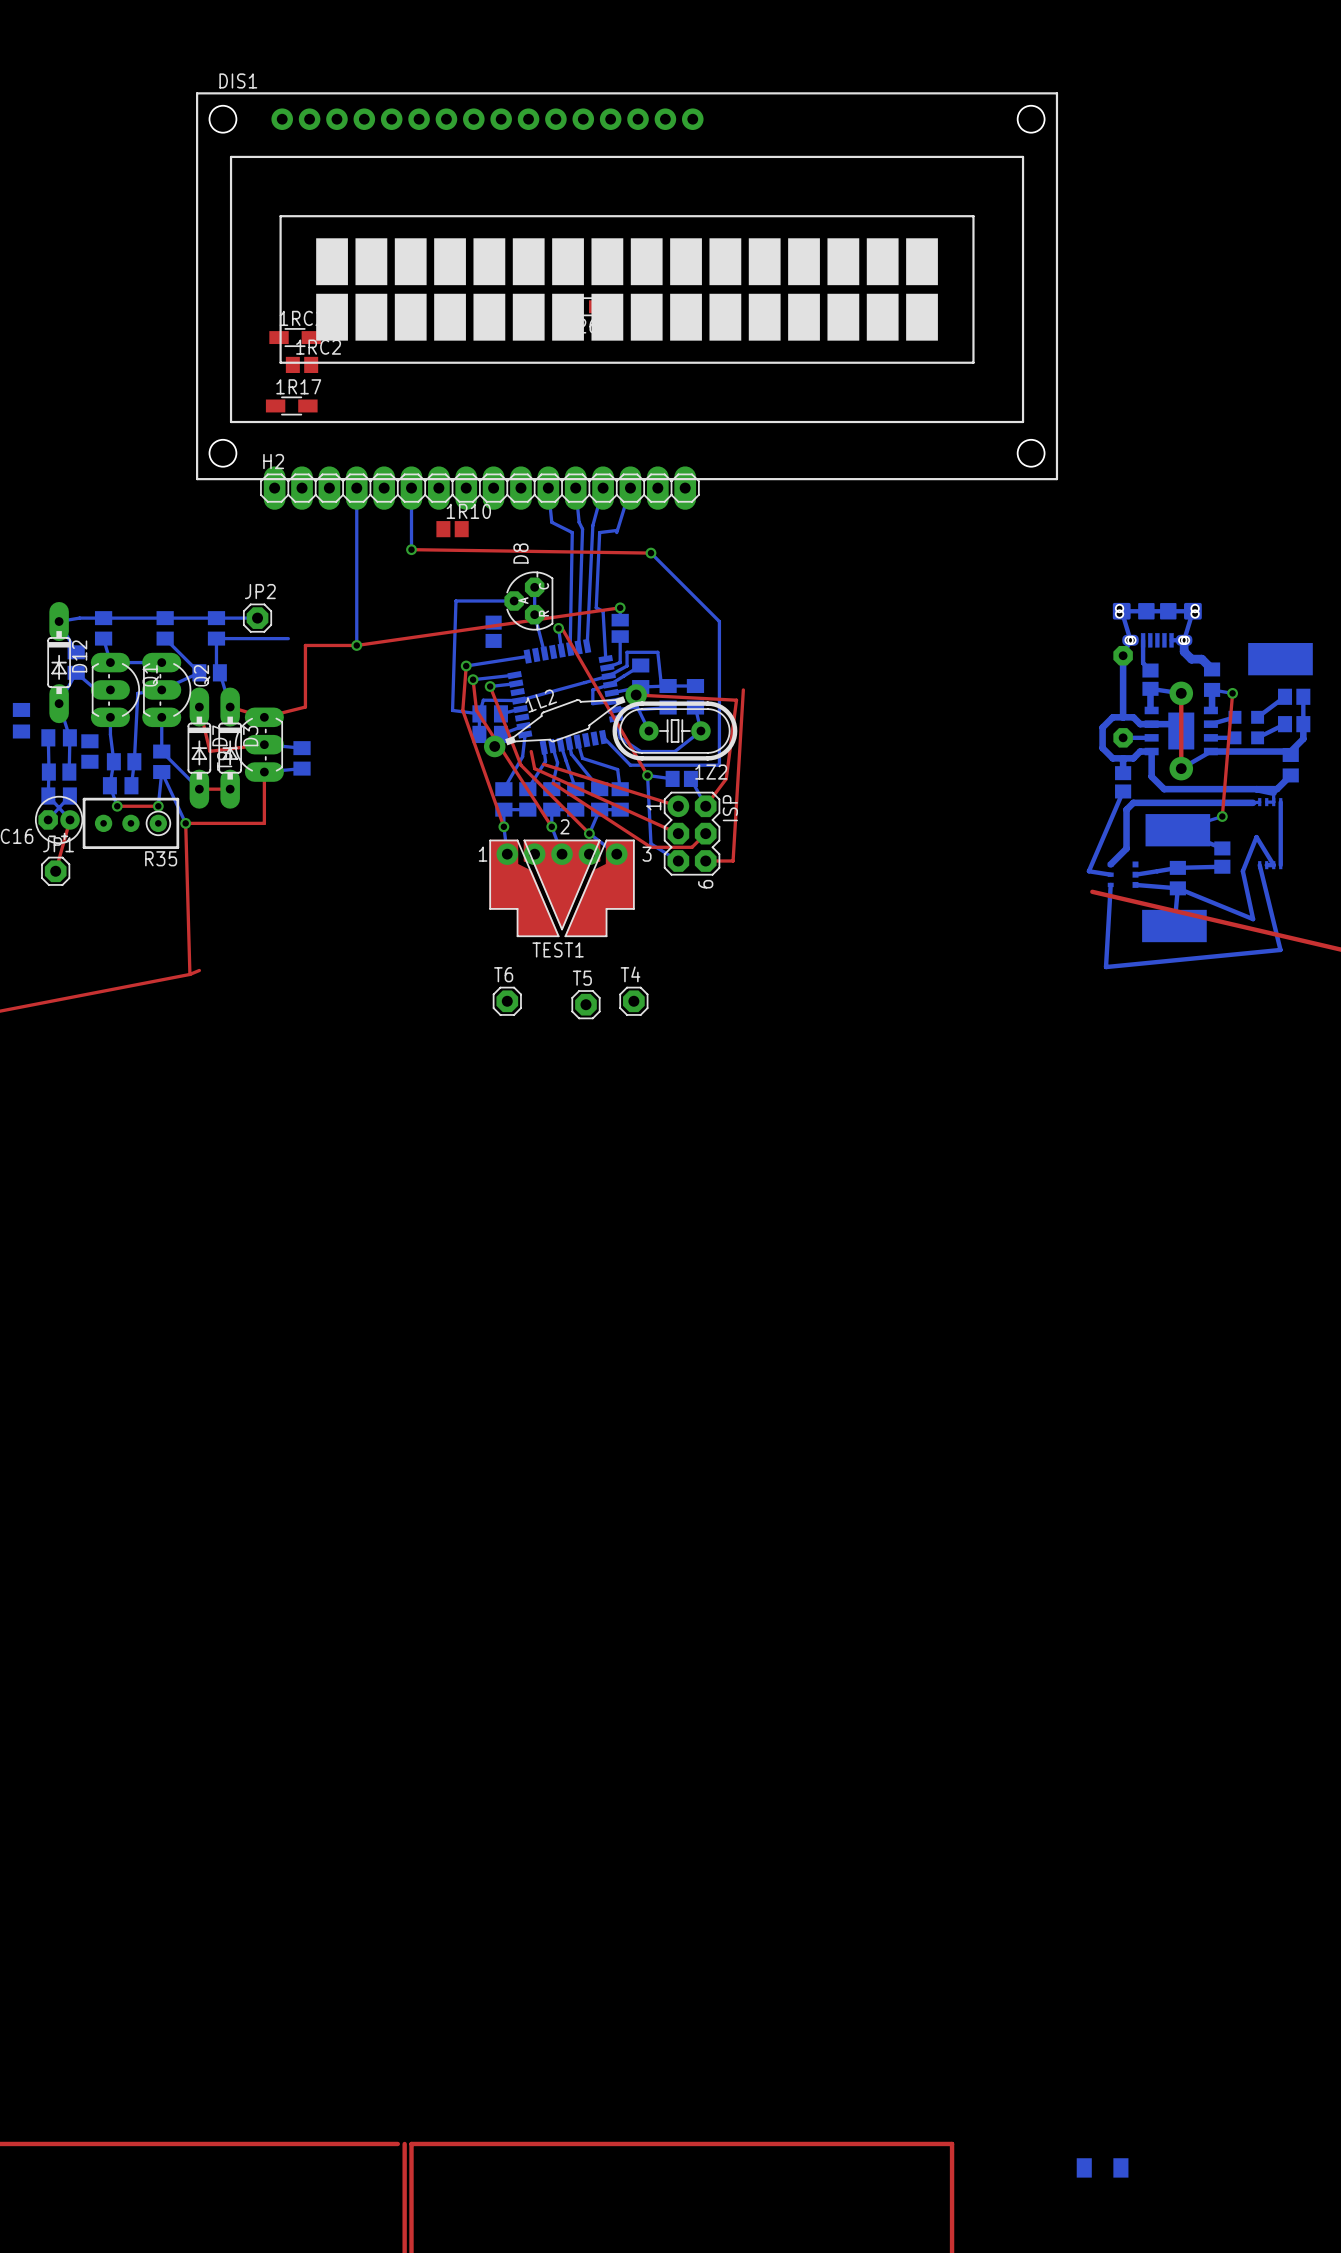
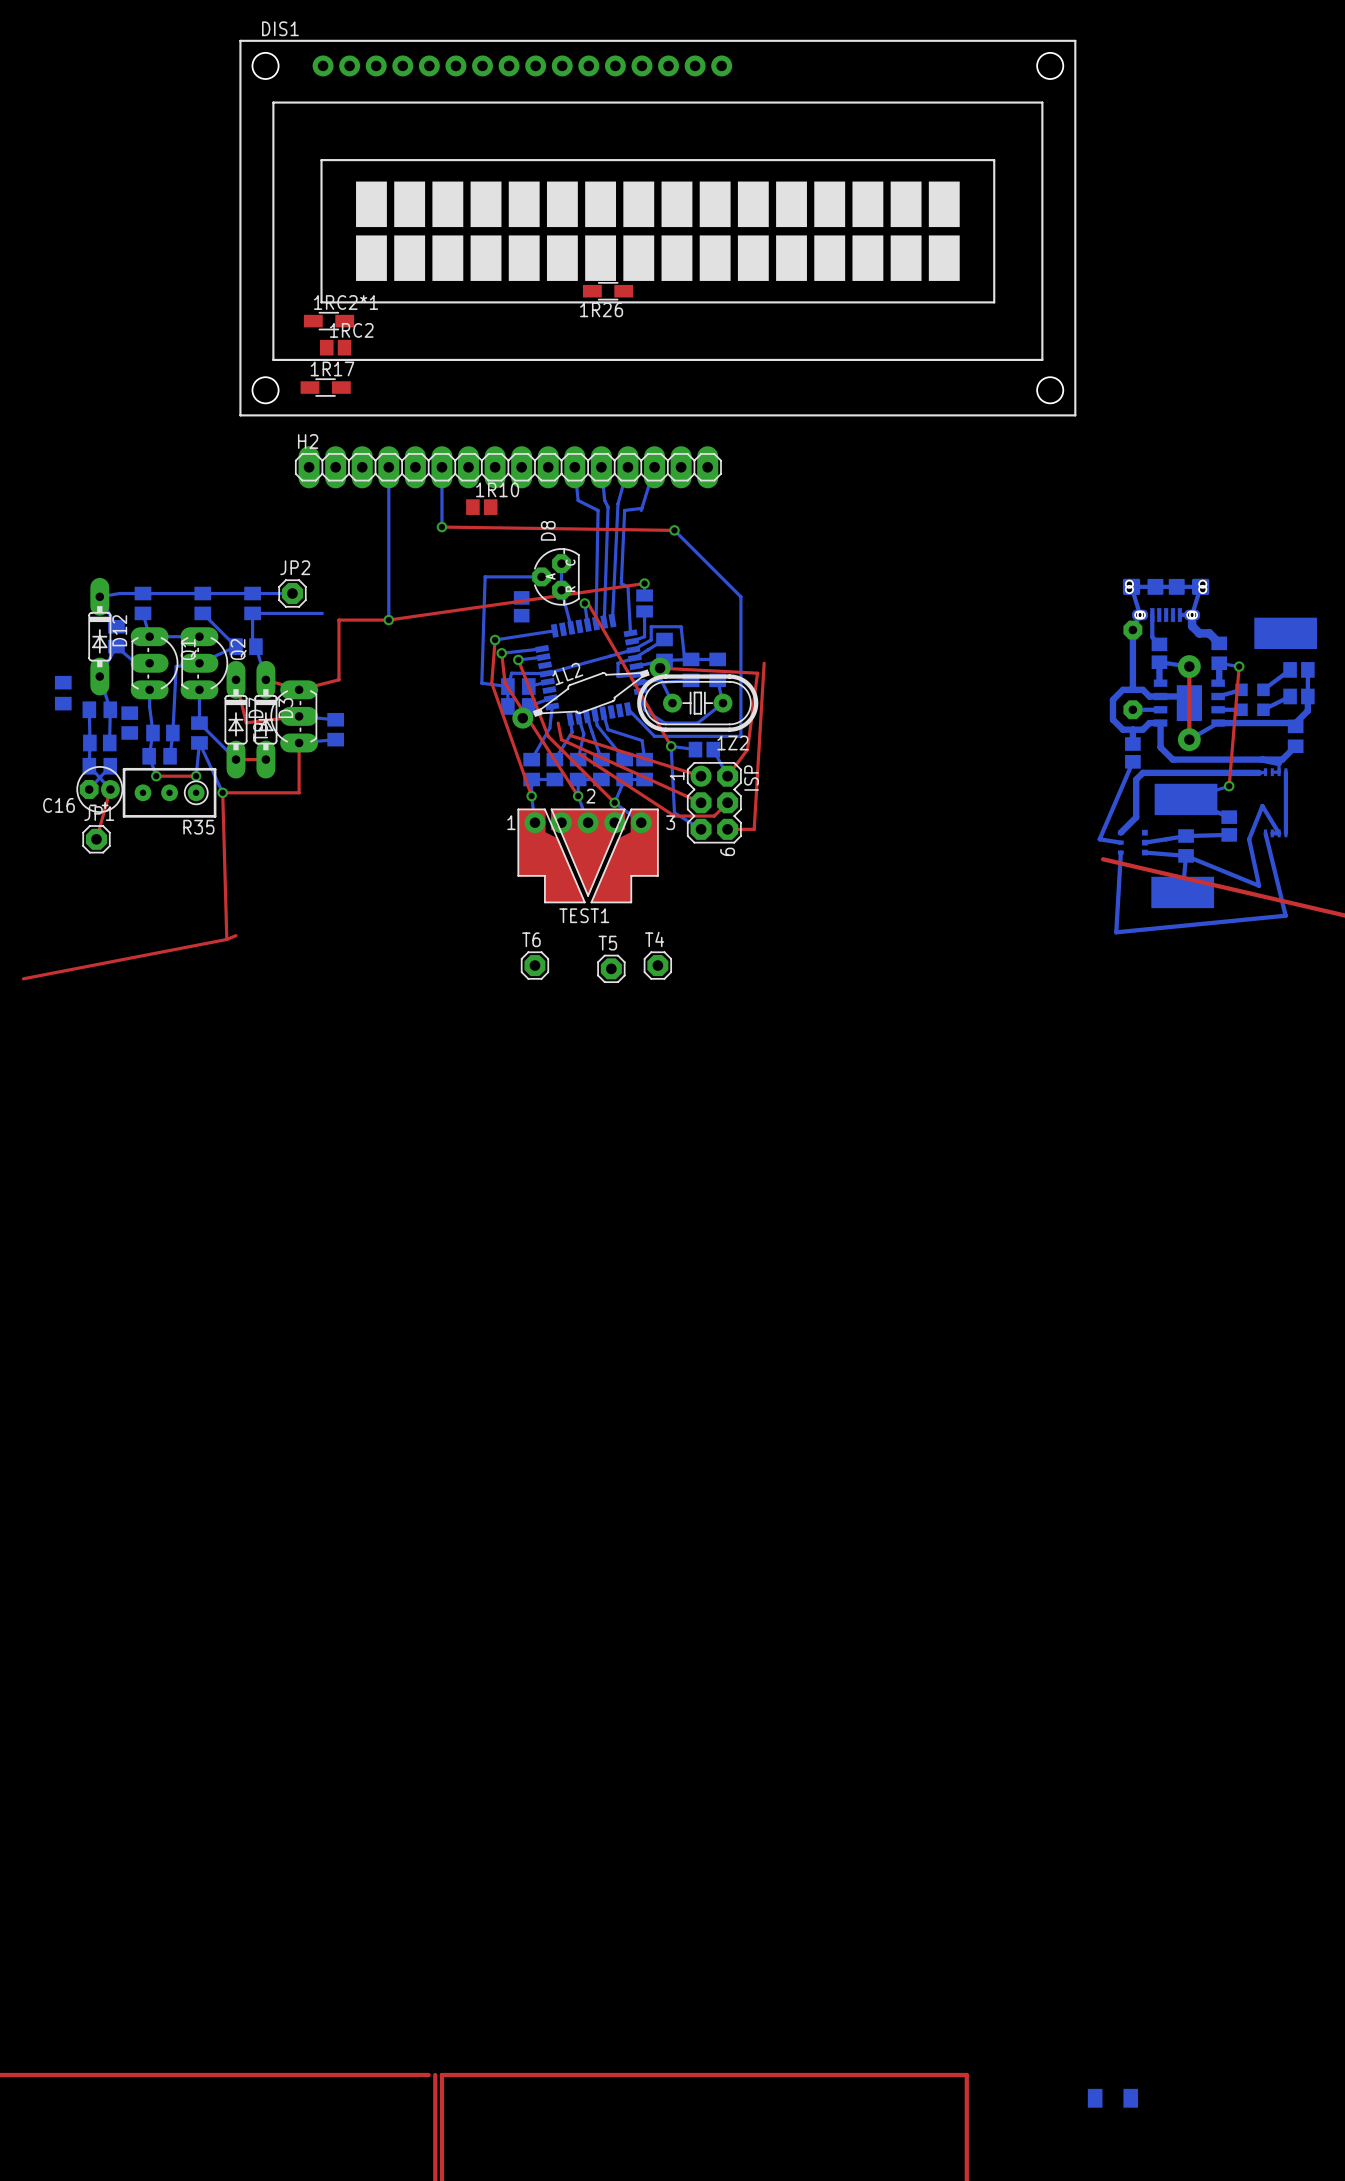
DIS1 position: (627, 286) -> (657, 228)

